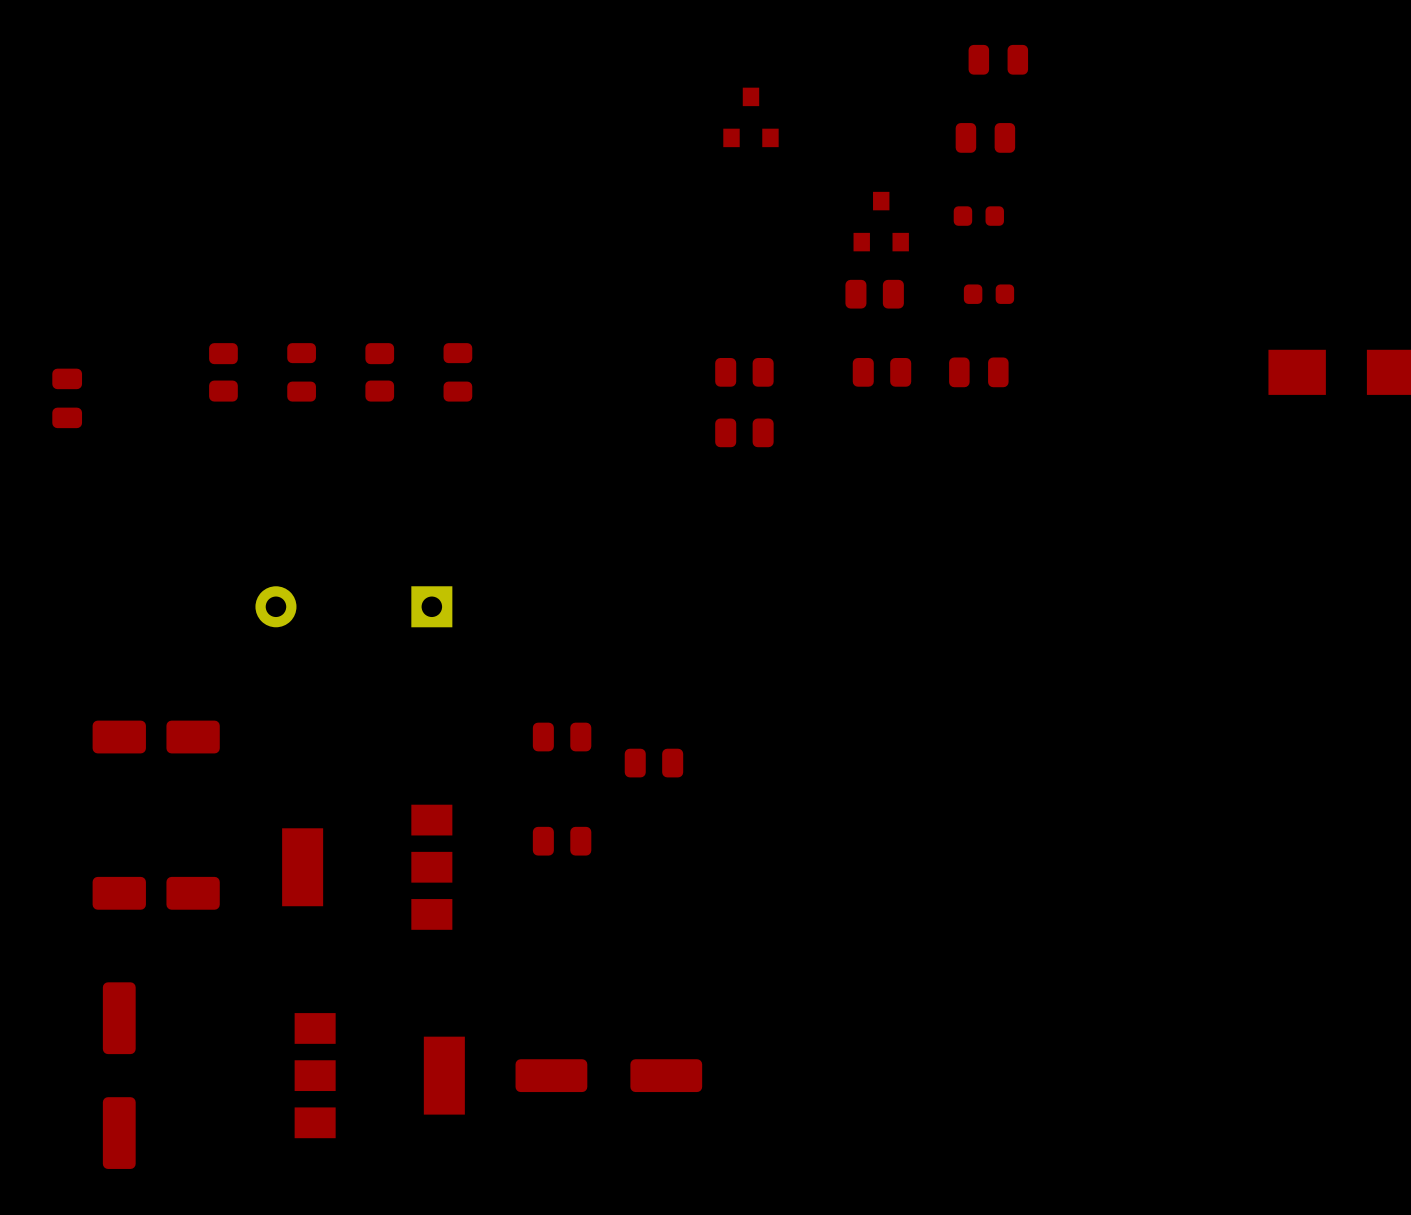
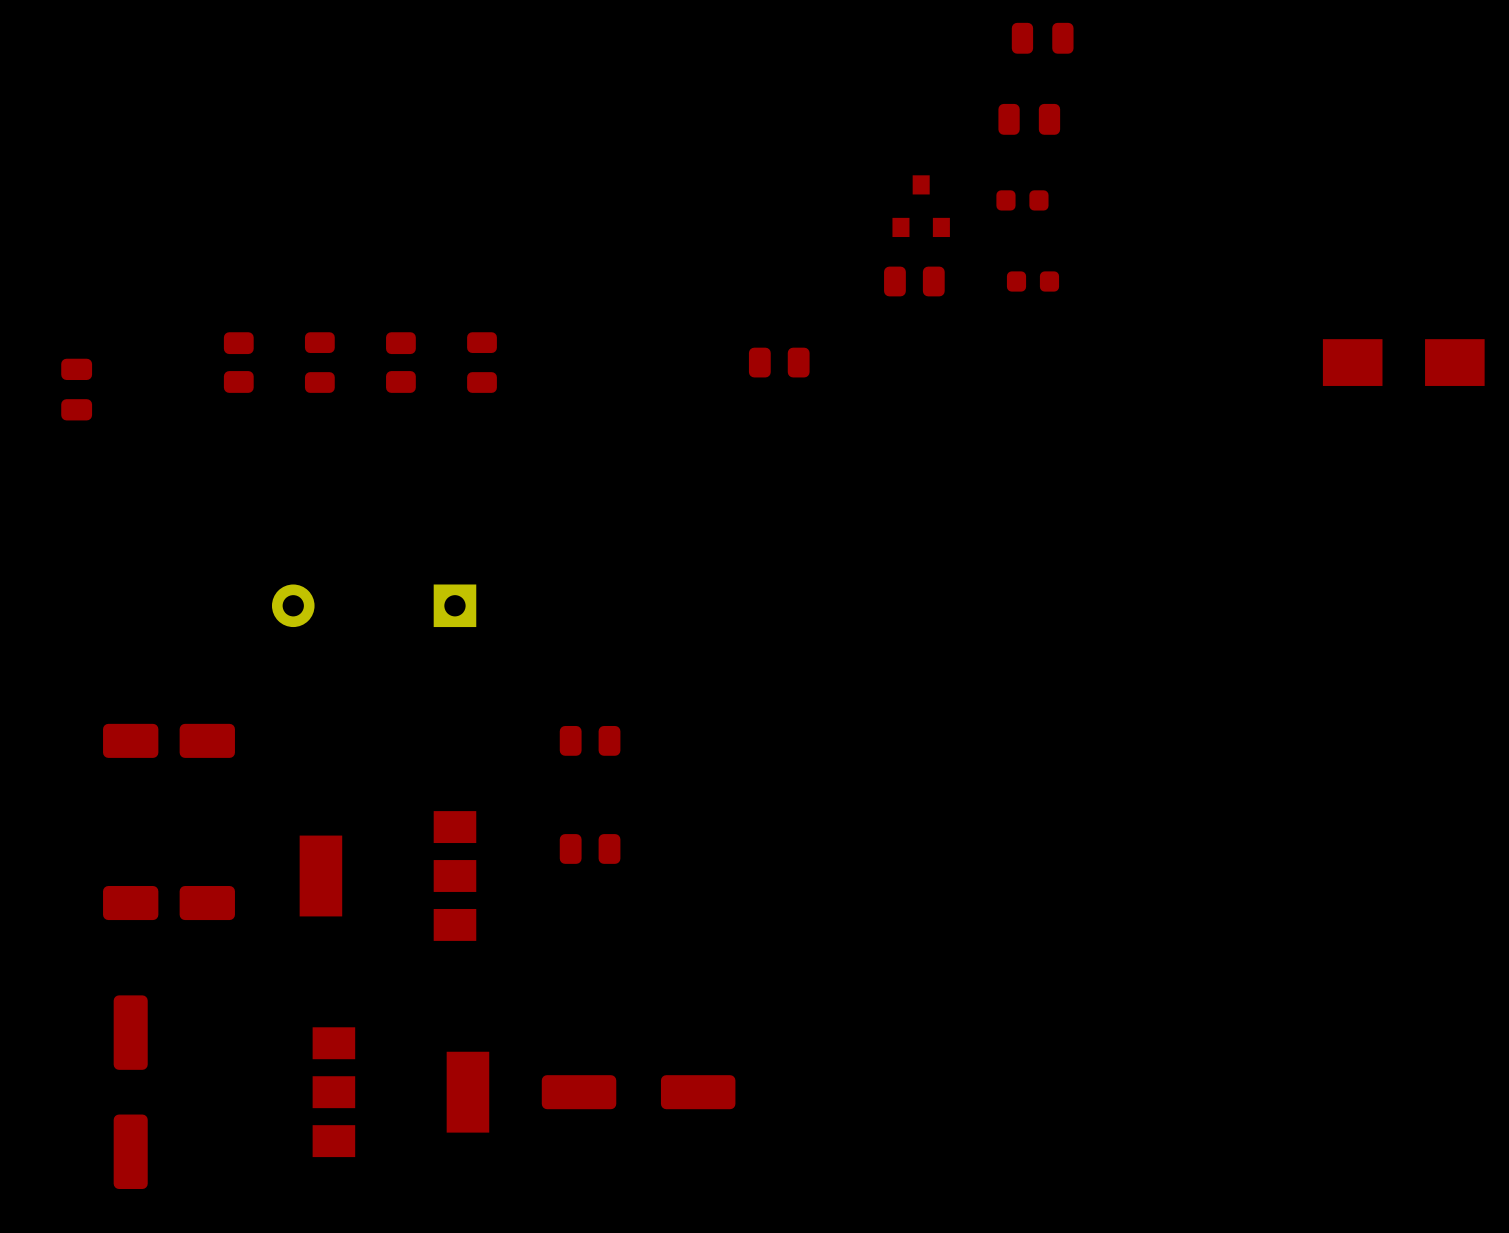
part: (750, 117) -> none
part: (881, 372) -> none
part: (978, 372) -> none
part: (744, 432) -> none
part: (653, 763) -> none

